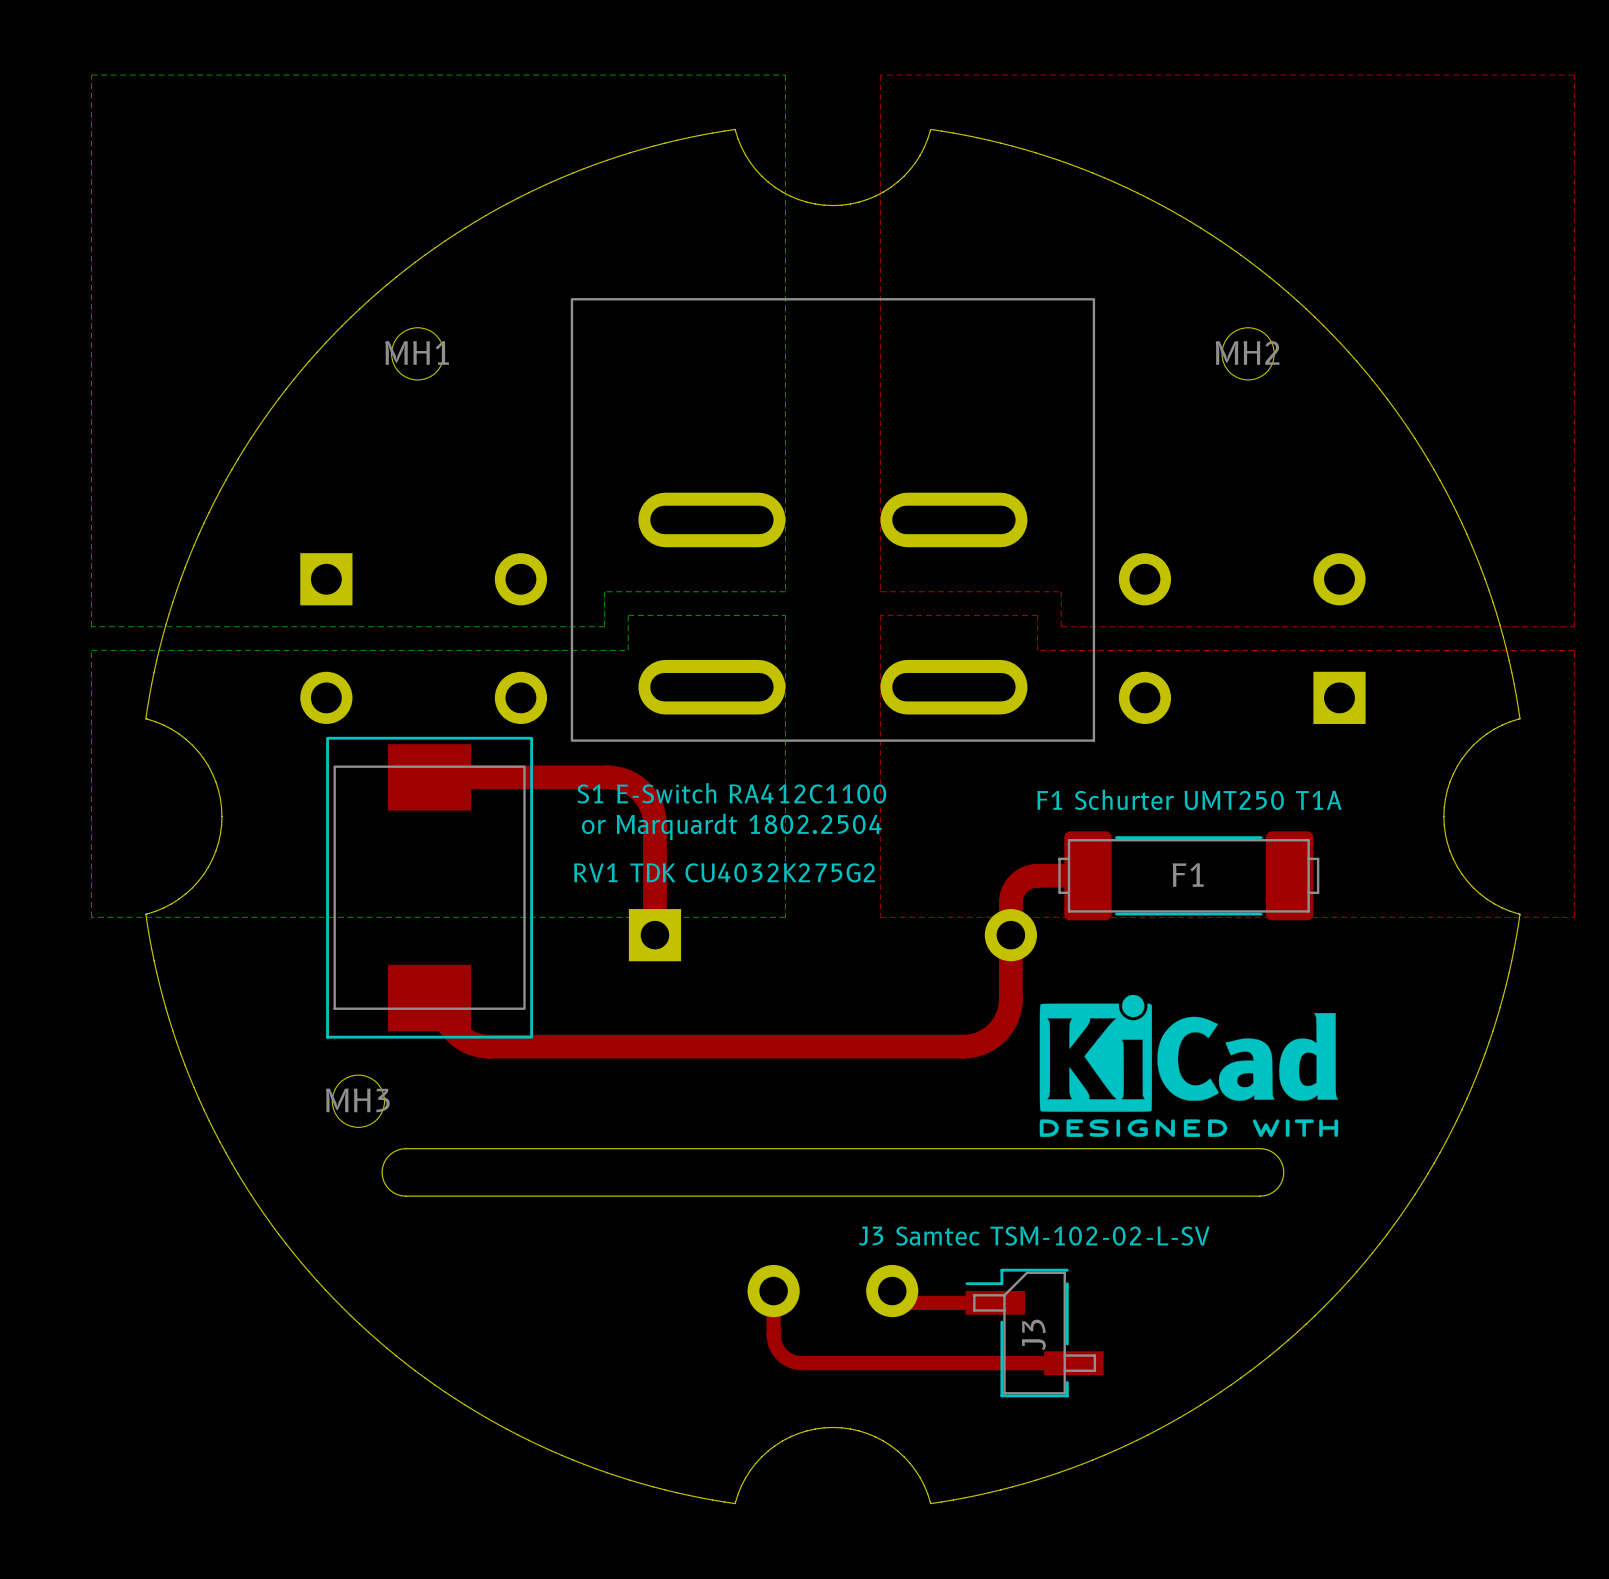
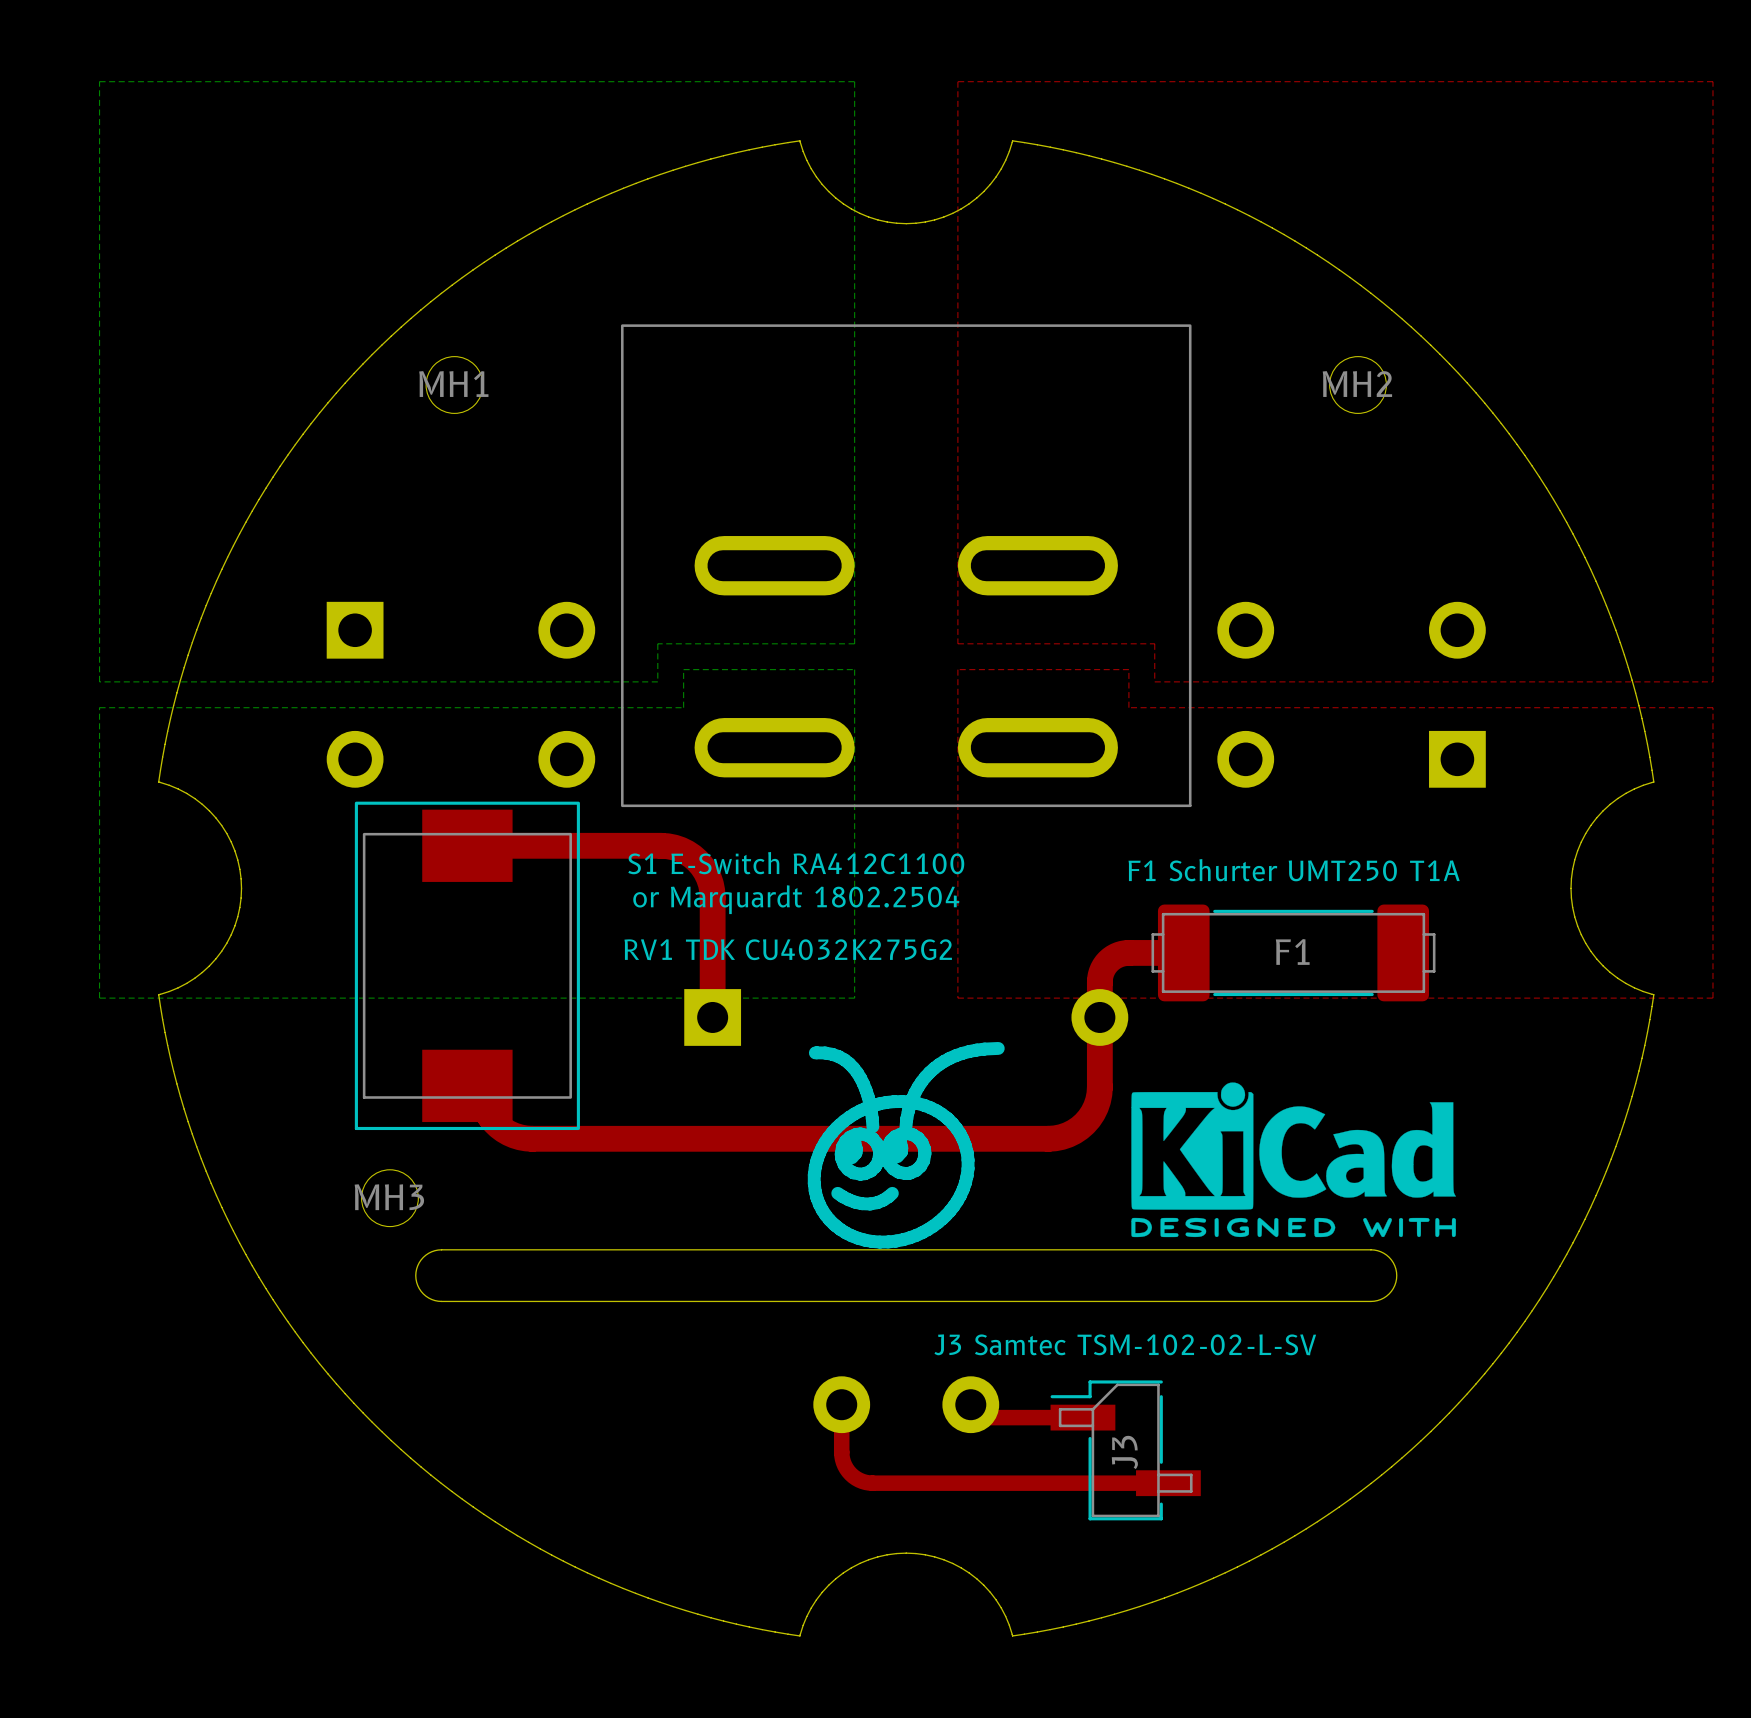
drawing: none -> [807, 1042, 1005, 1249]

